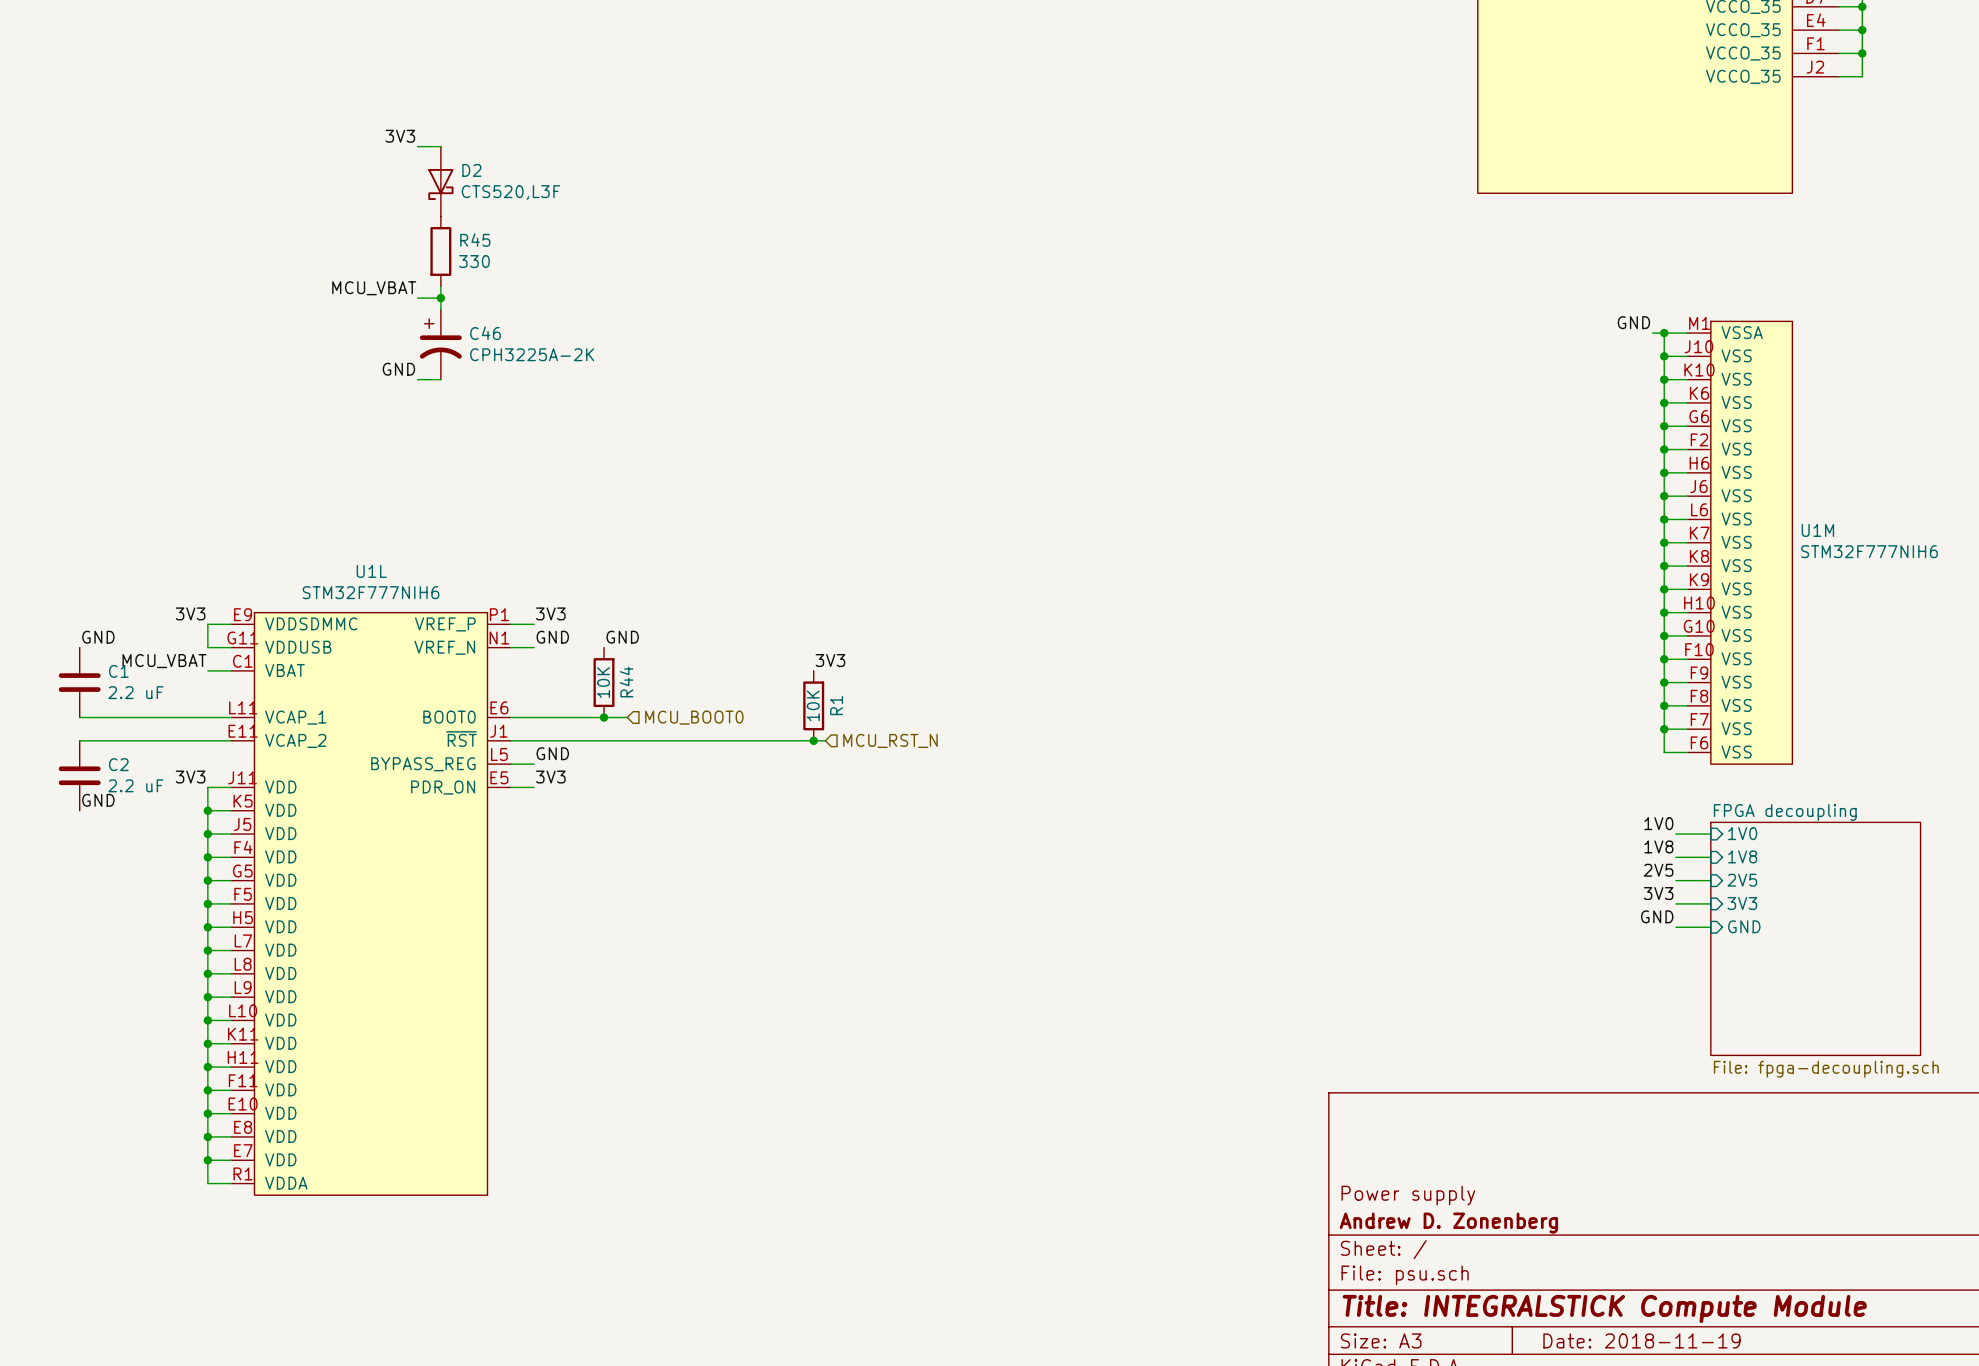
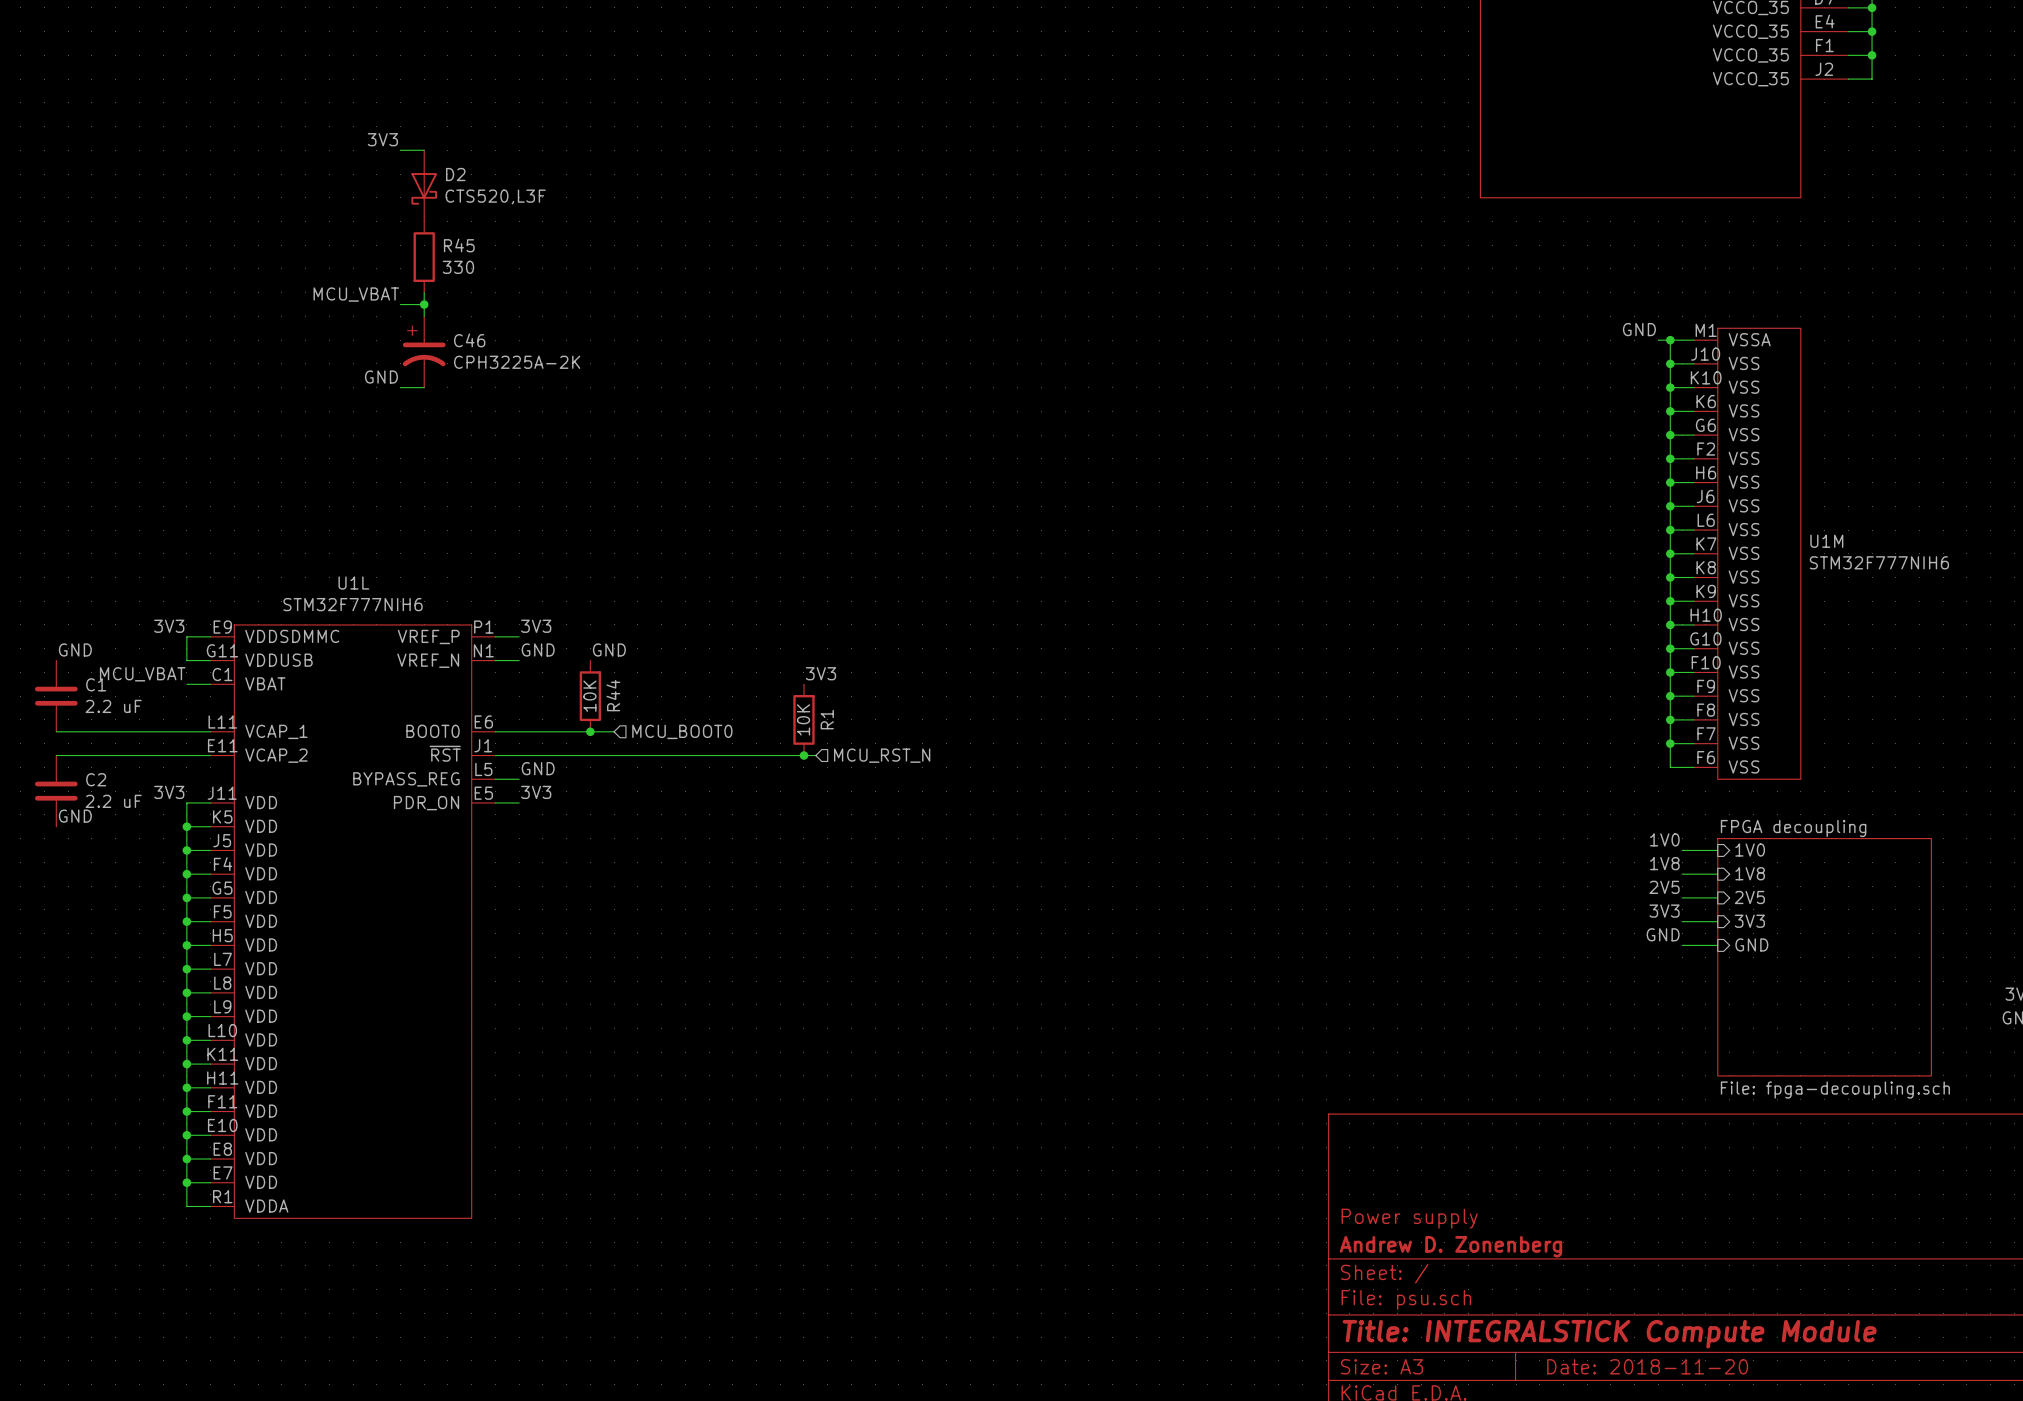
title block: Date: 2018-11-19 (1641, 1340) -> Date: 2018-11-20 (1647, 1366)

